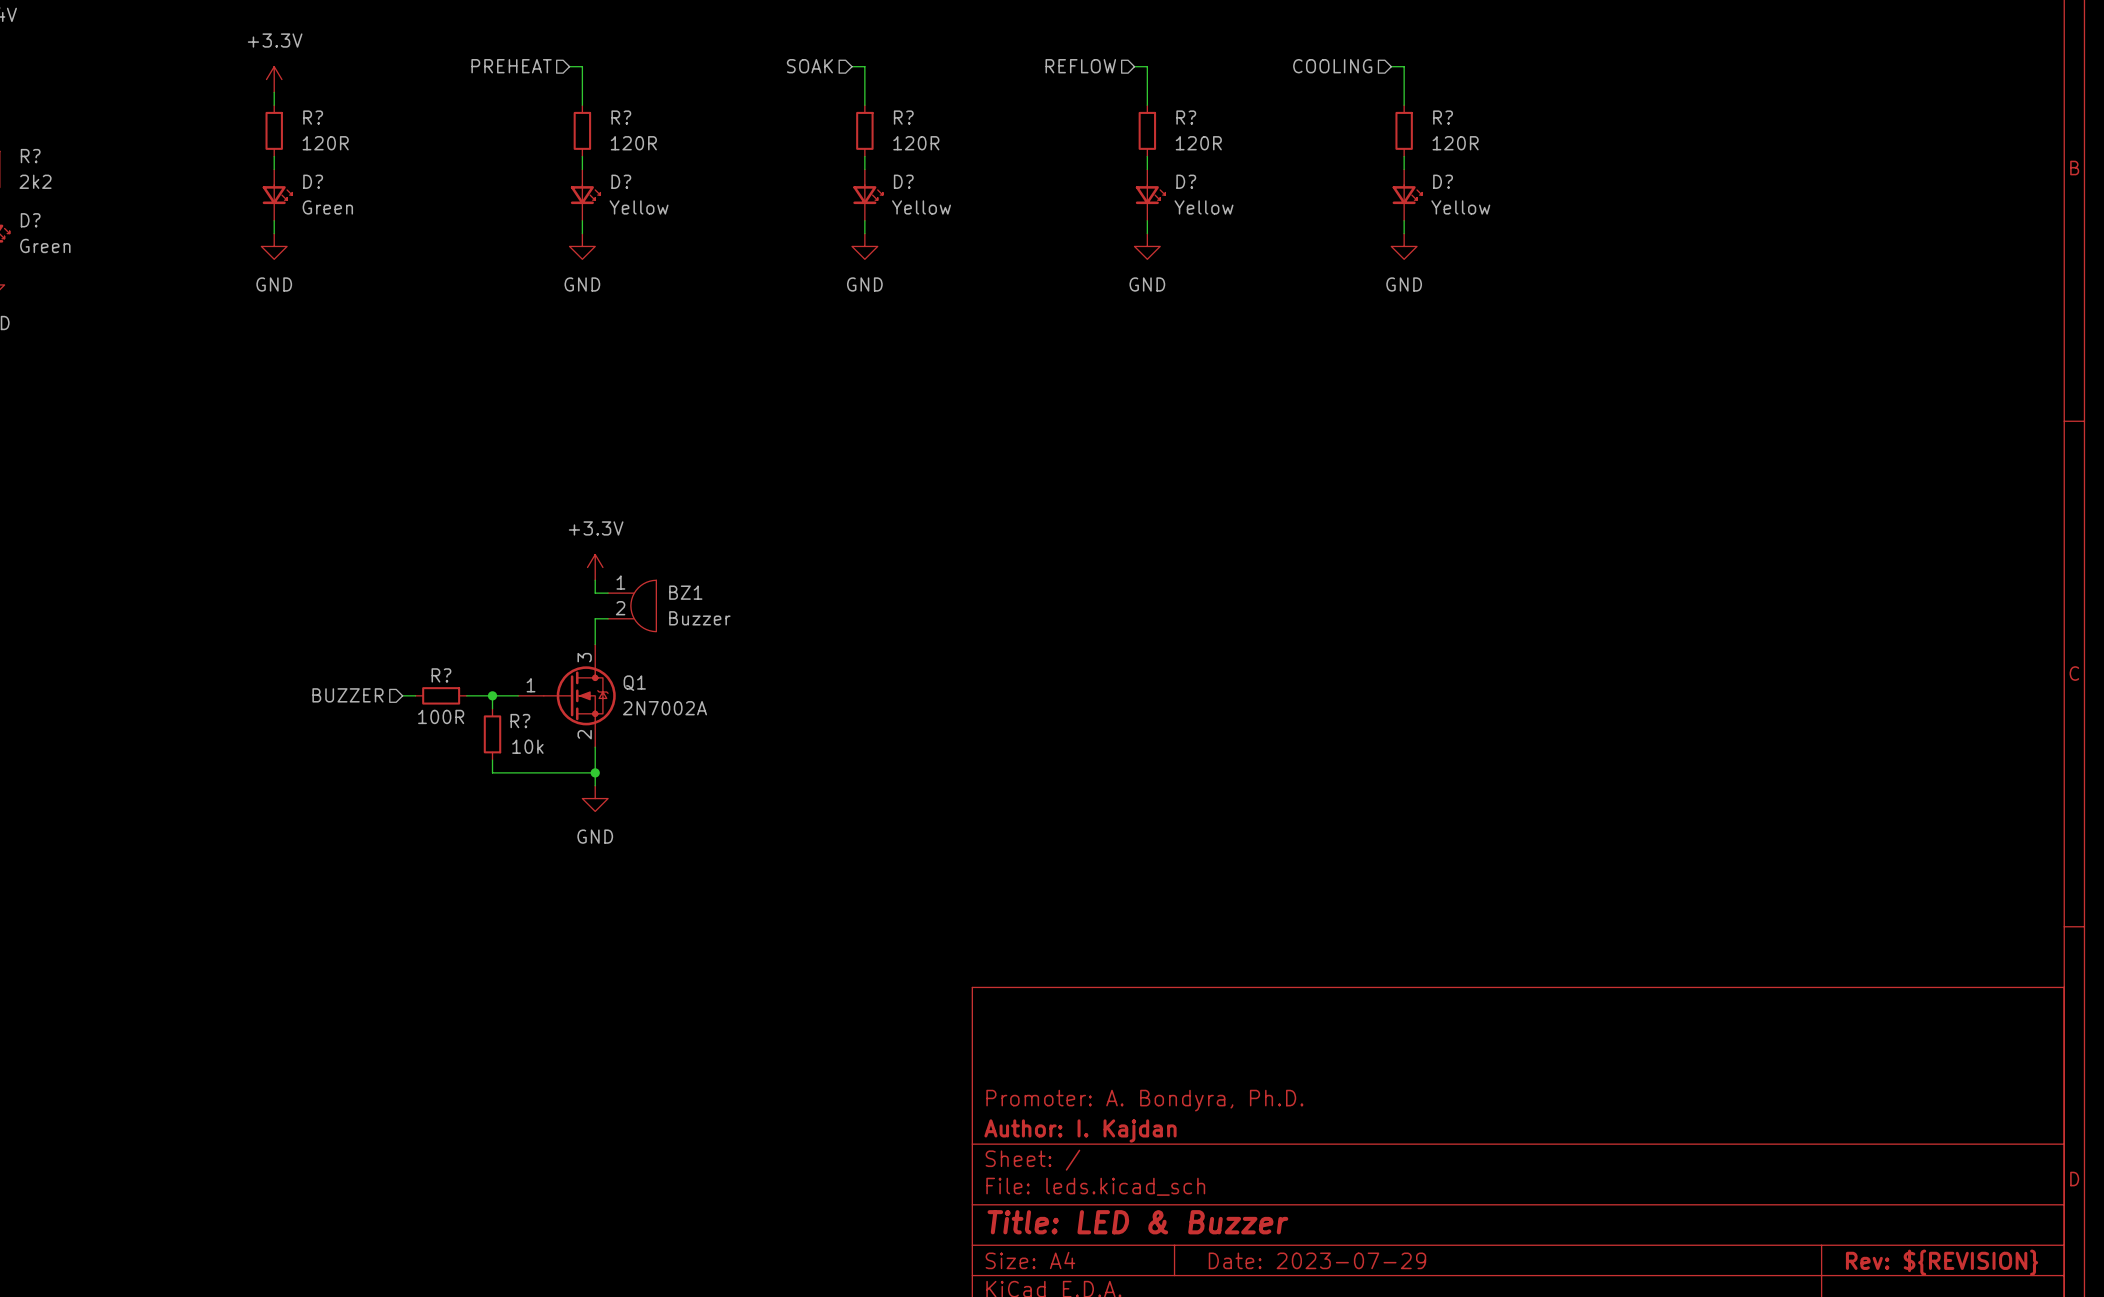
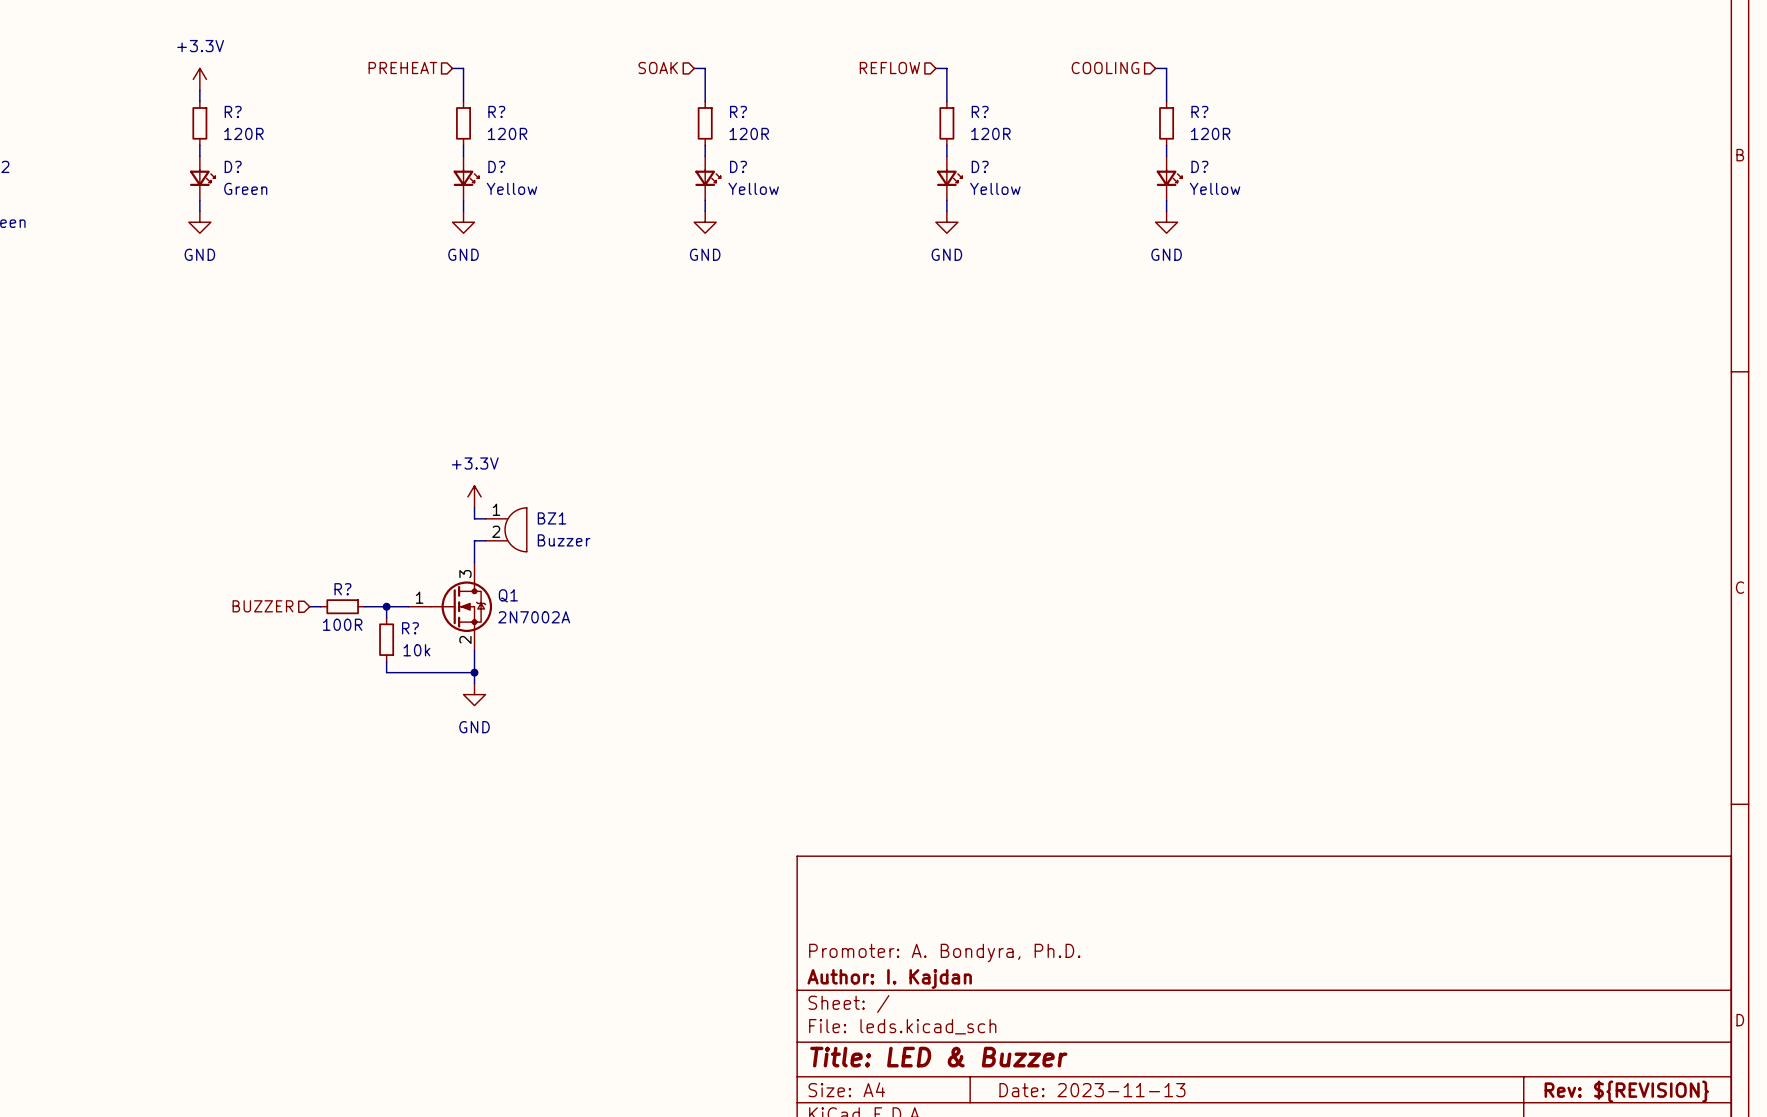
title block: Date: 2023-07-29 (1317, 1260) -> Date: 2023-11-13 (1092, 1090)

